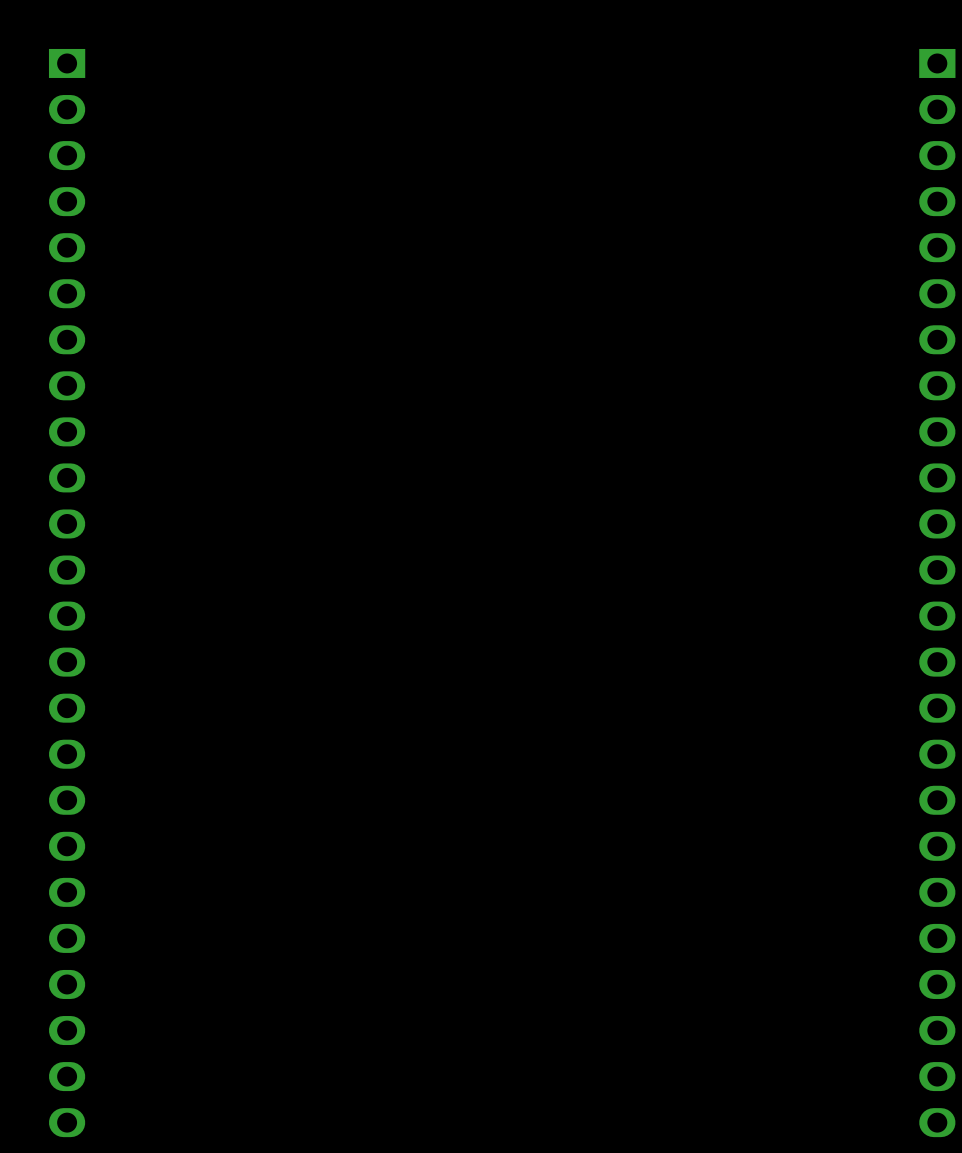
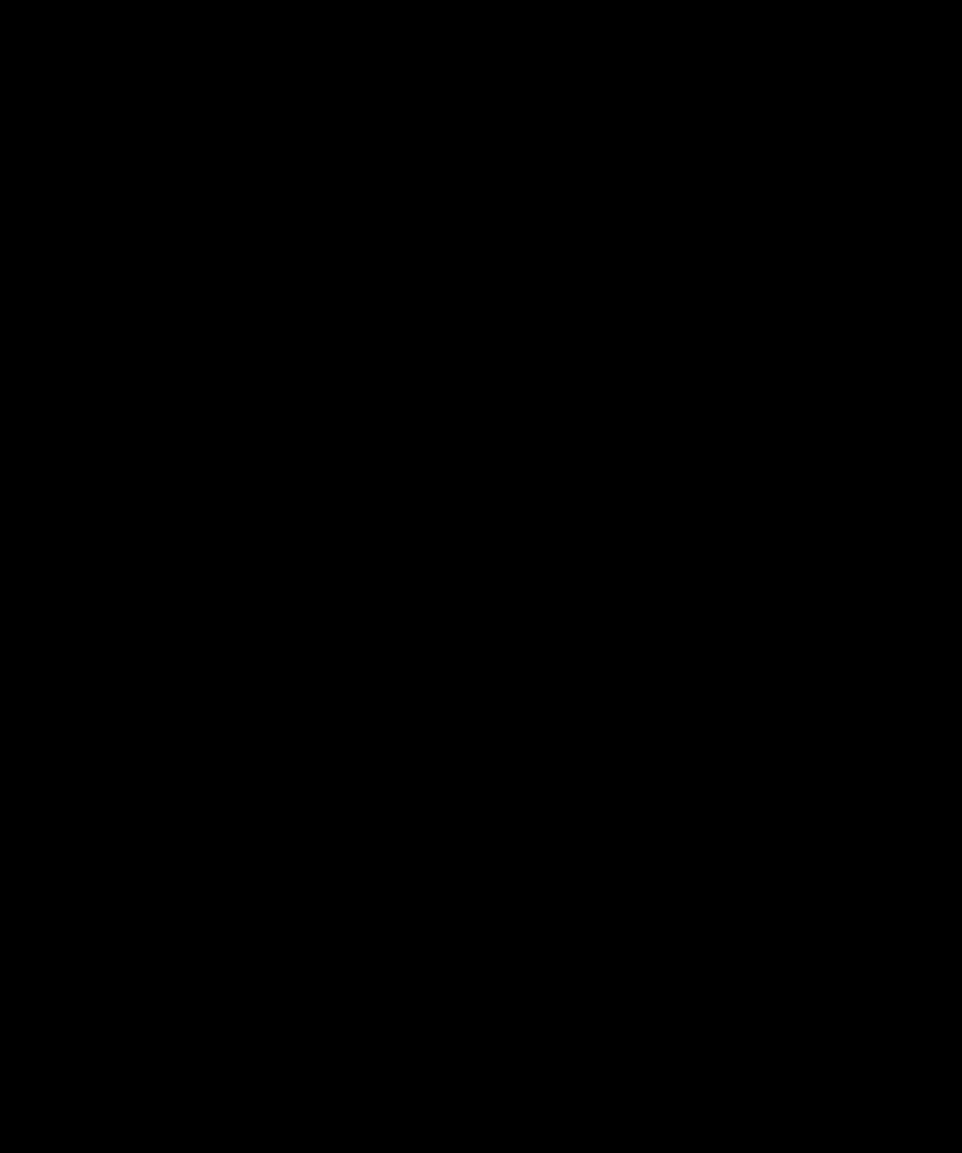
part: (67, 593) -> none
part: (937, 593) -> none

